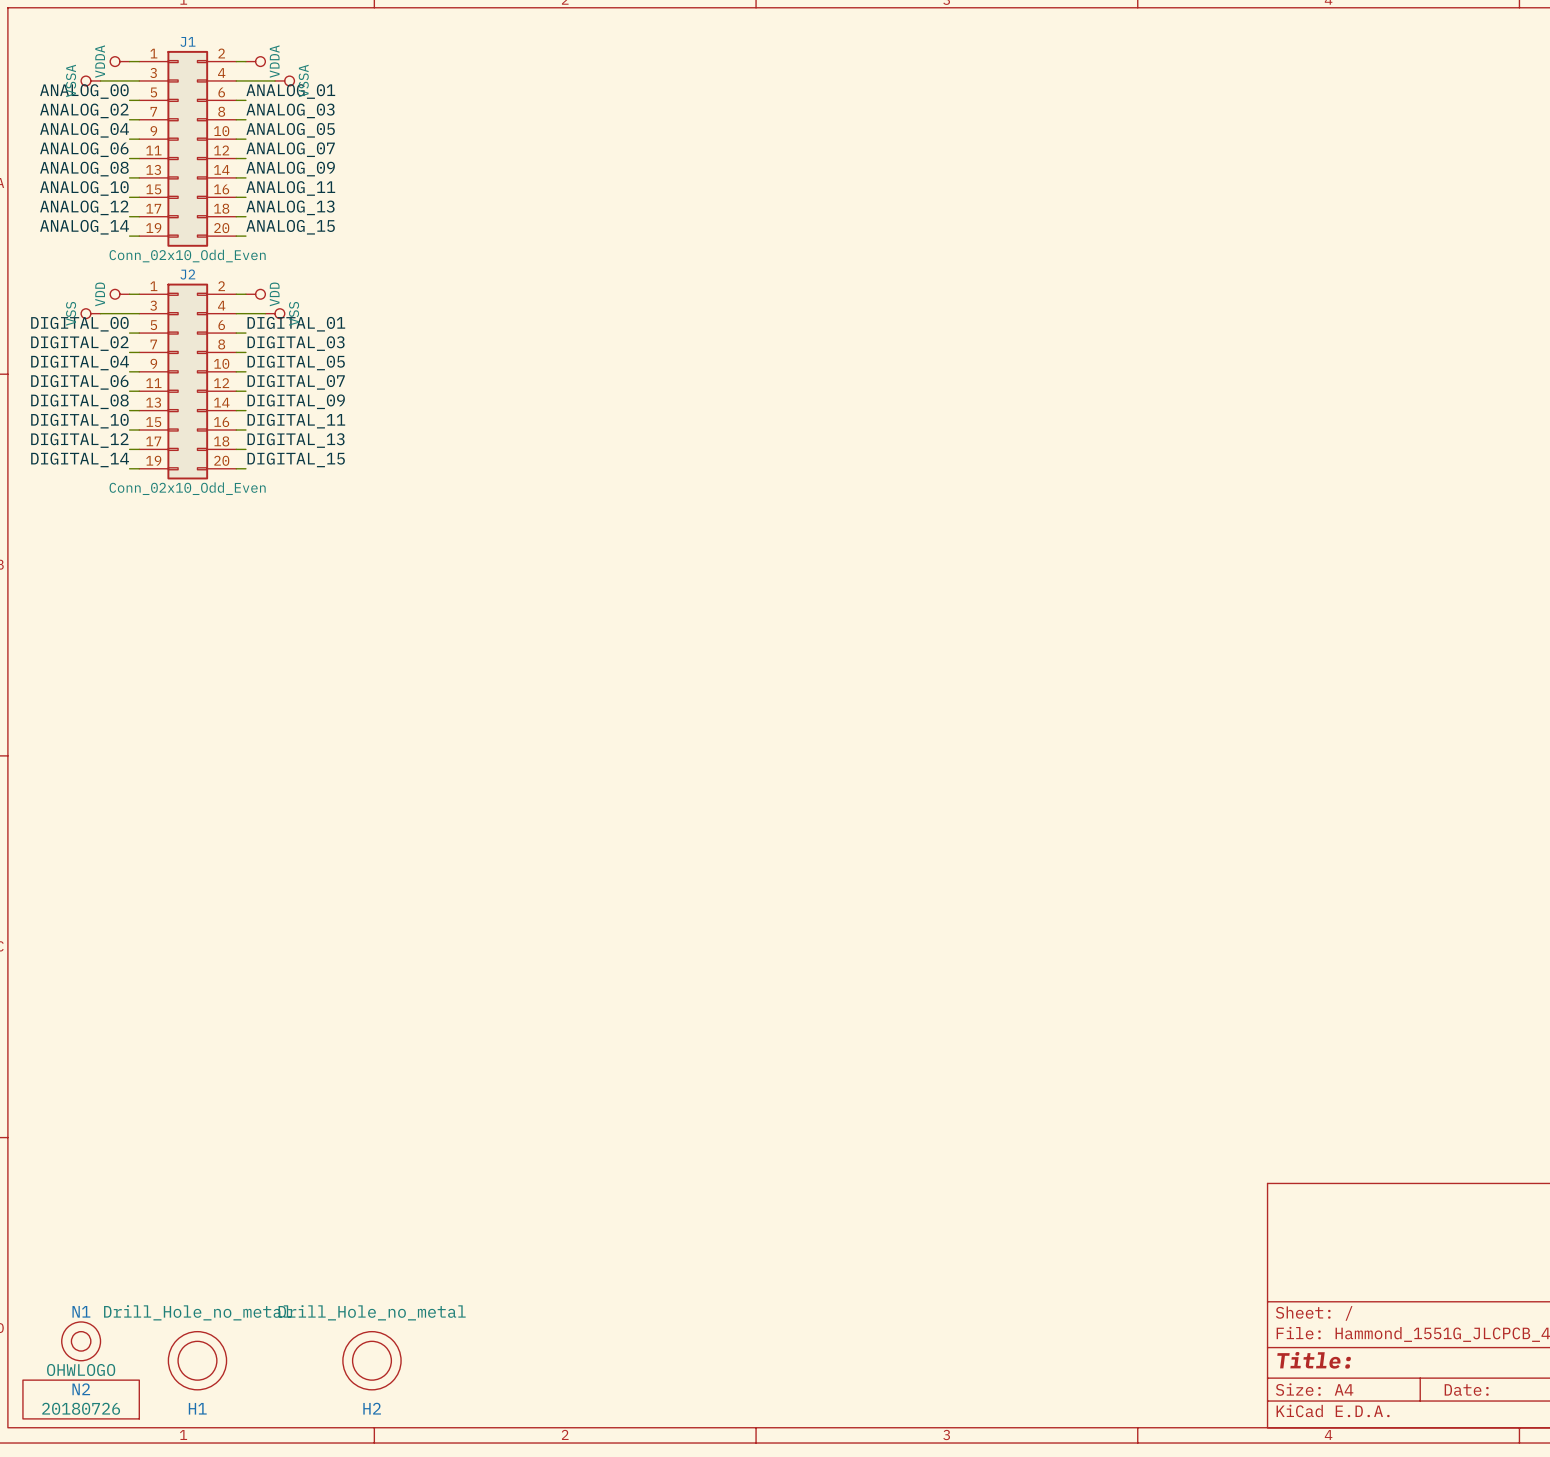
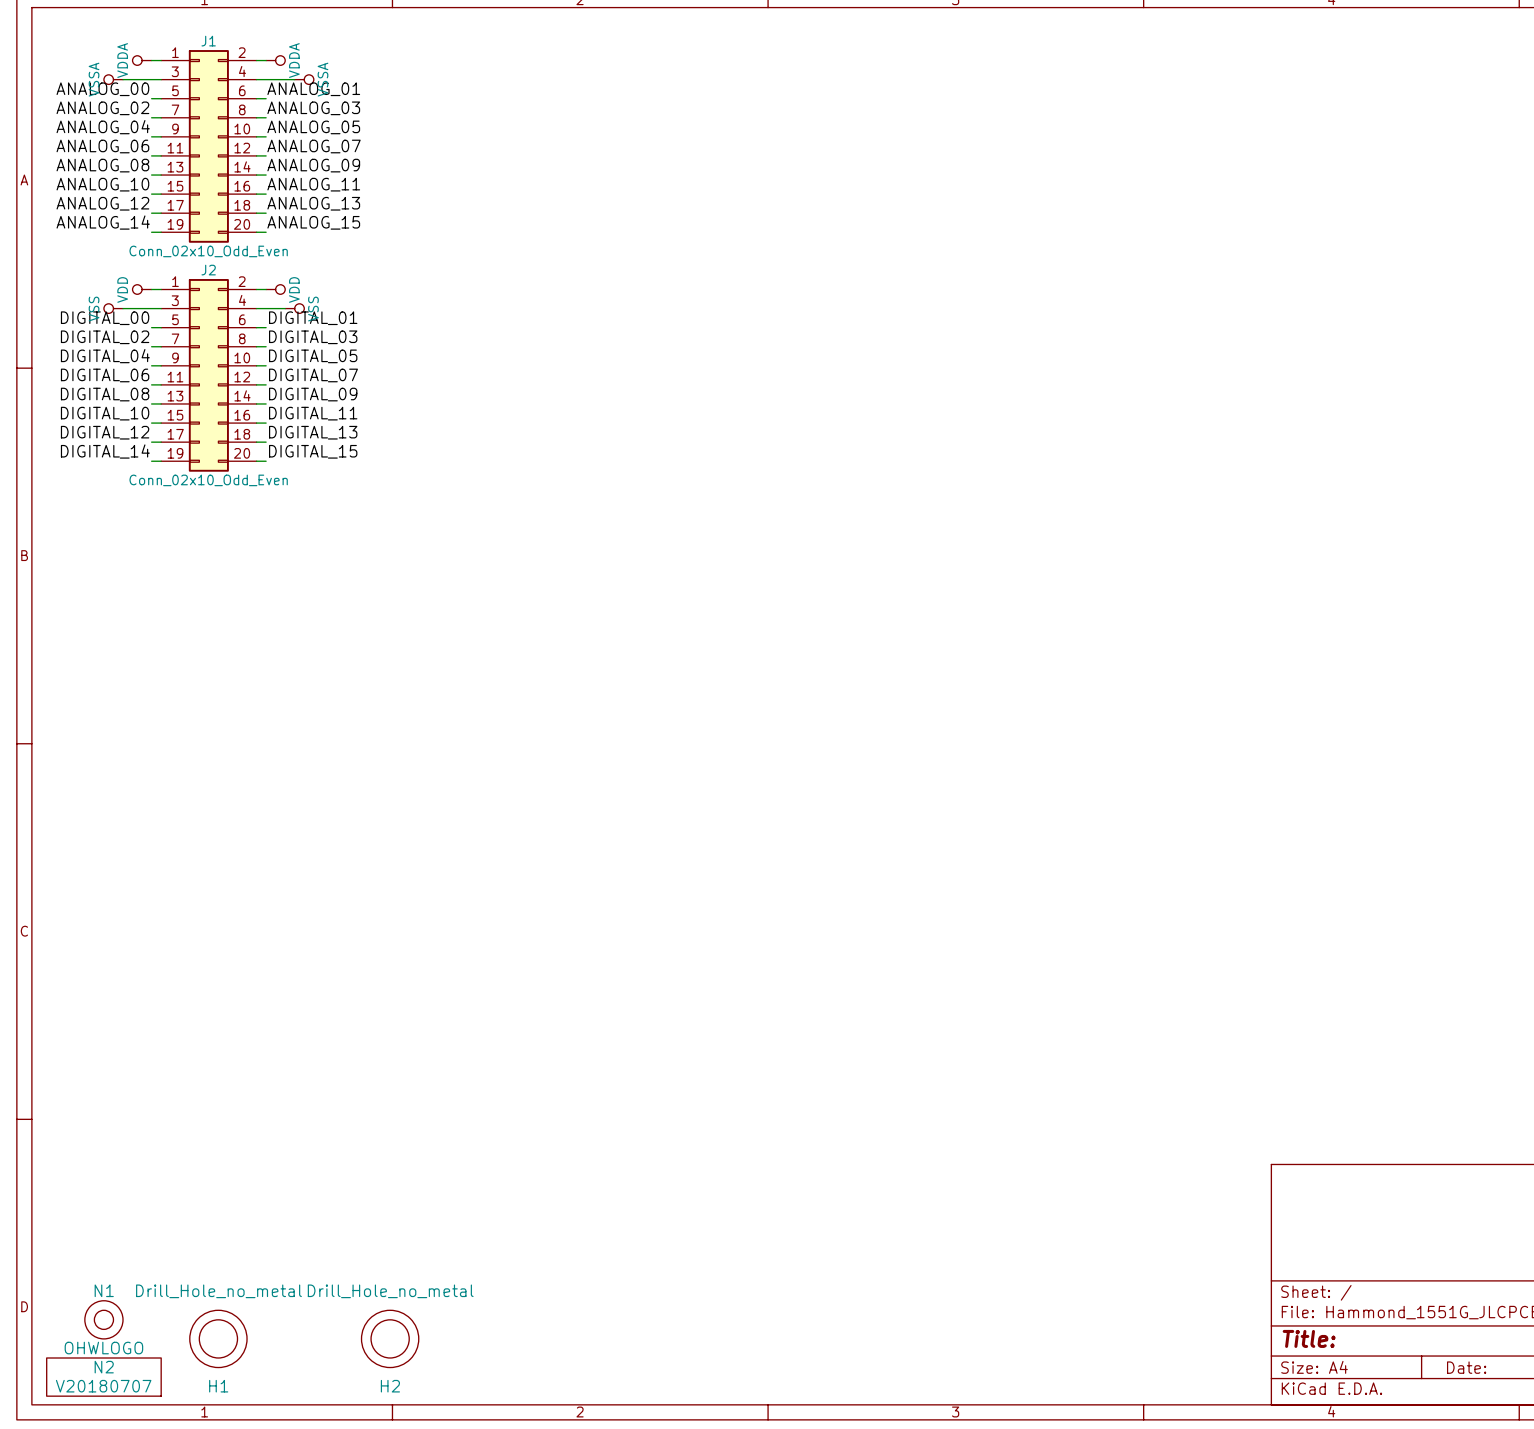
N2 value: 20180726 (81, 1408) -> V20180707 (103, 1386)

